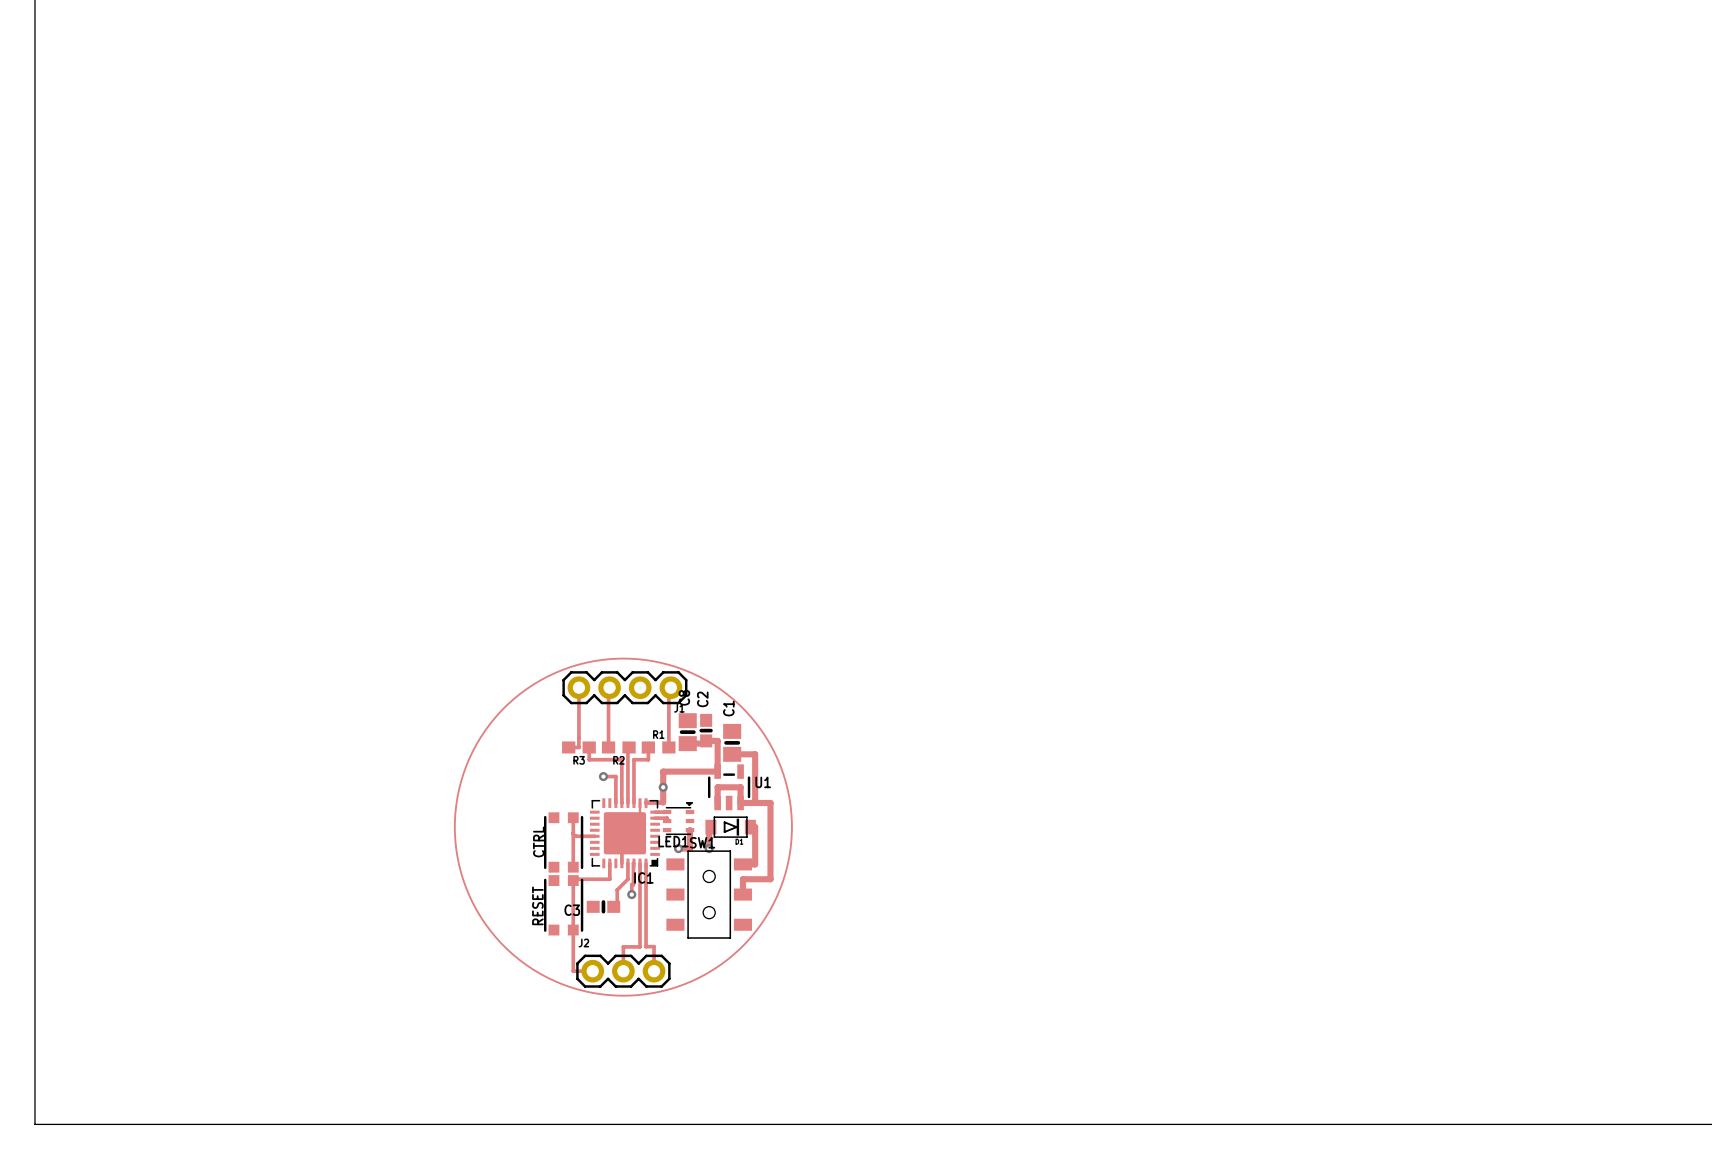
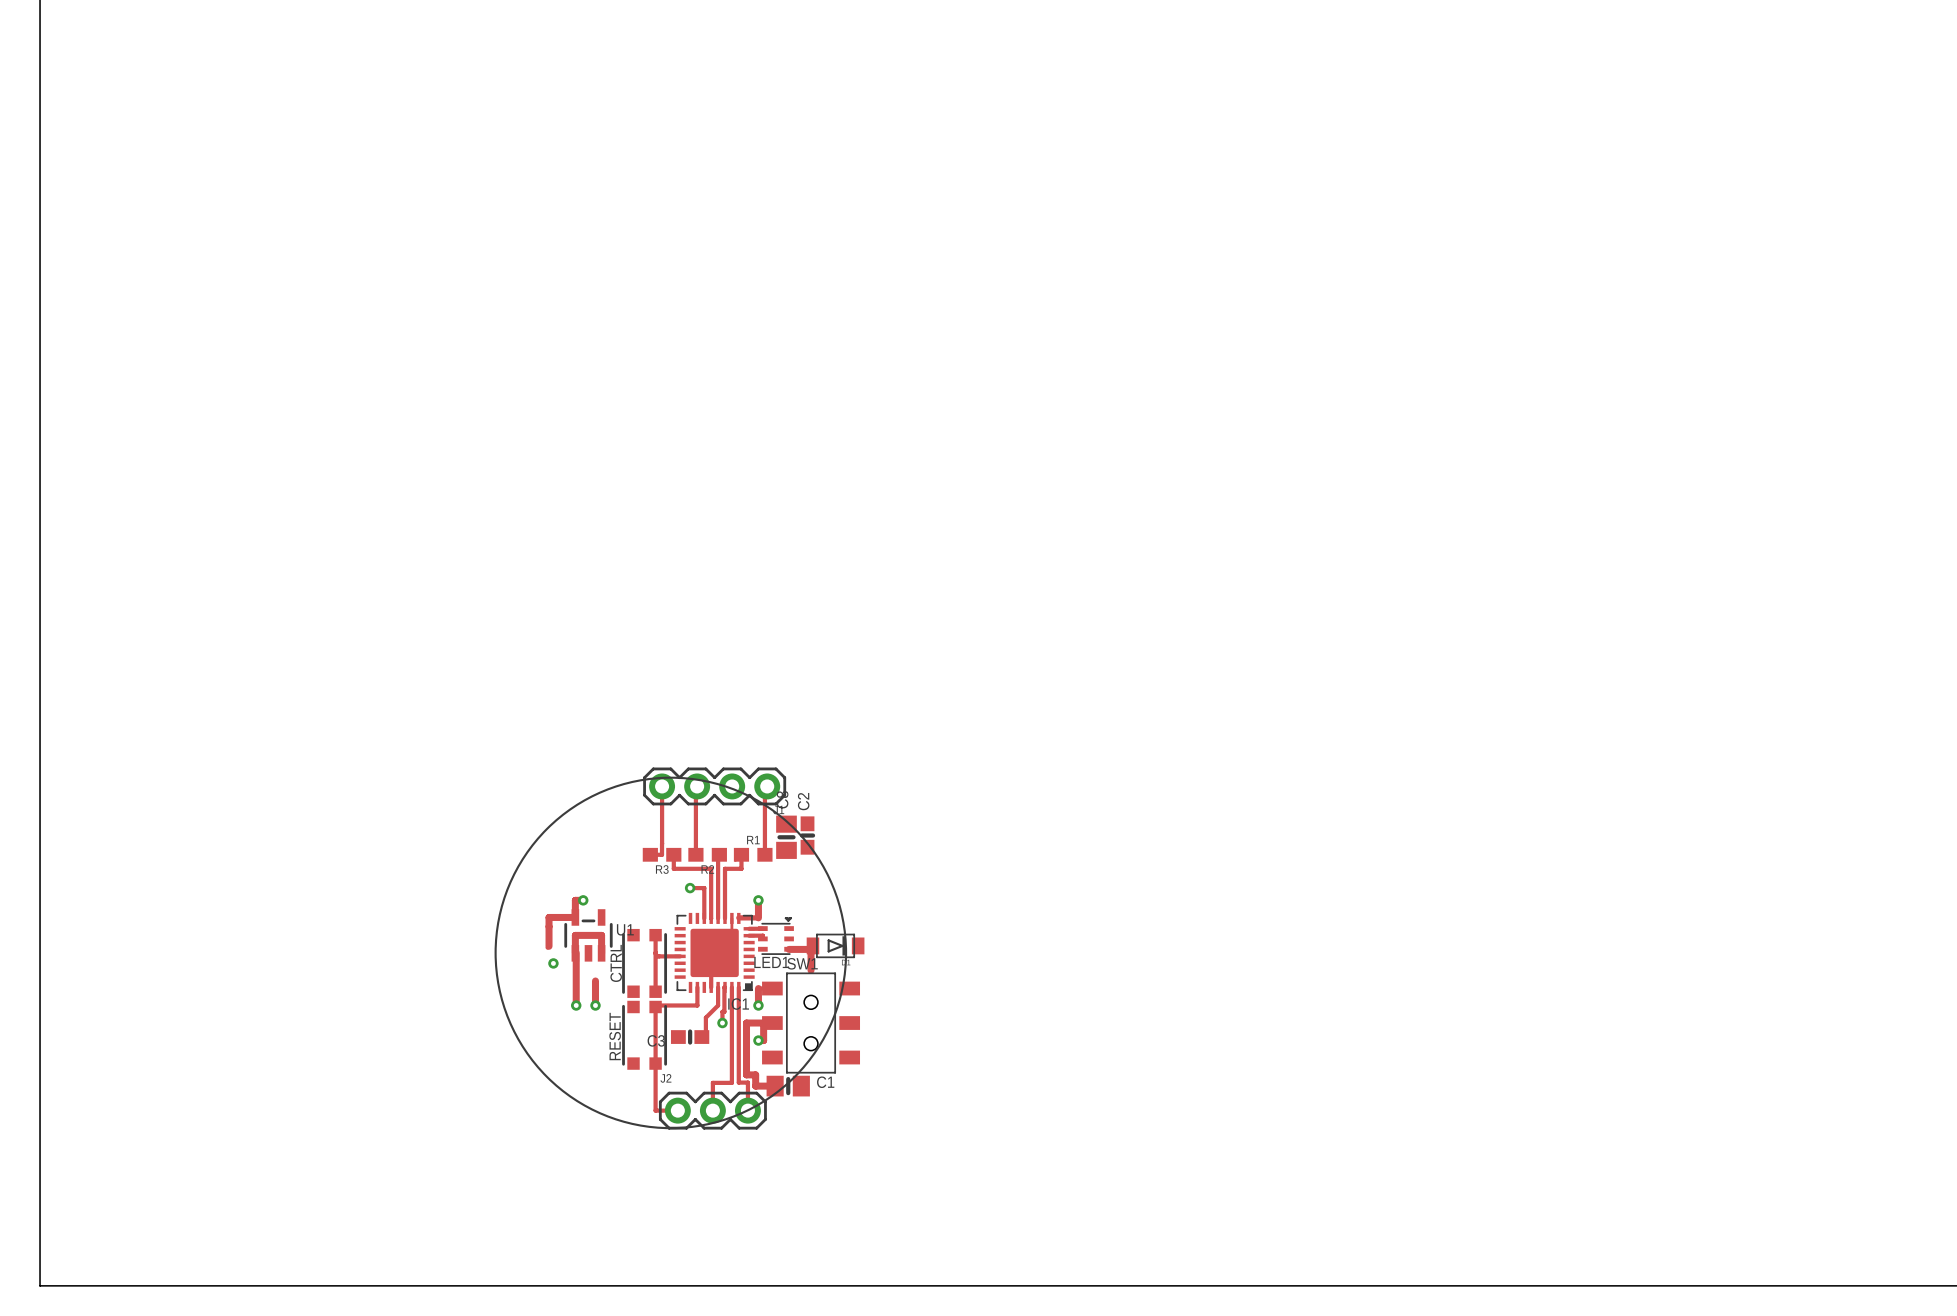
drawing: [453, 657, 793, 997] -> none
drawing: none -> [494, 776, 848, 1130]
C1 rotation: 0° (732, 742) -> 90° clockwise (788, 1086)
C1 position: (732, 742) -> (788, 1086)
track: (687, 743) (706, 743) (706, 740) (717, 740) (717, 771) (663, 771) (663, 787) -> none
track: (732, 754) (755, 754) (755, 802) -> none
track: none -> (583, 900) (575, 900) (575, 917) (549, 917) (547, 947)
via: none -> (583, 900)
U1 position: (729, 787) -> (588, 935)
track: (717, 802) (717, 787) (740, 787) (740, 802) (770, 802) (770, 879) (742, 879) (742, 894) -> none
track: (750, 827) (755, 827) (755, 864) (739, 864) -> none
track: (690, 830) (690, 848) (678, 848) -> (789, 949) (811, 949)
track: none -> (575, 952) (576, 1005)
track: none -> (575, 952) (575, 935) (601, 935) (601, 953)
via: none -> (553, 963)
via: (678, 848) -> none
via: (709, 848) -> none
track: none -> (595, 980) (595, 1005)
track: none -> (763, 988) (758, 988) (758, 1005)
via: none -> (576, 1005)
via: none -> (595, 1005)
via: none -> (758, 1005)
track: none -> (758, 1040) (763, 1040) (763, 1023) (746, 1023) (746, 1074) (755, 1074) (755, 1086) (775, 1086)
via: none -> (758, 1040)

